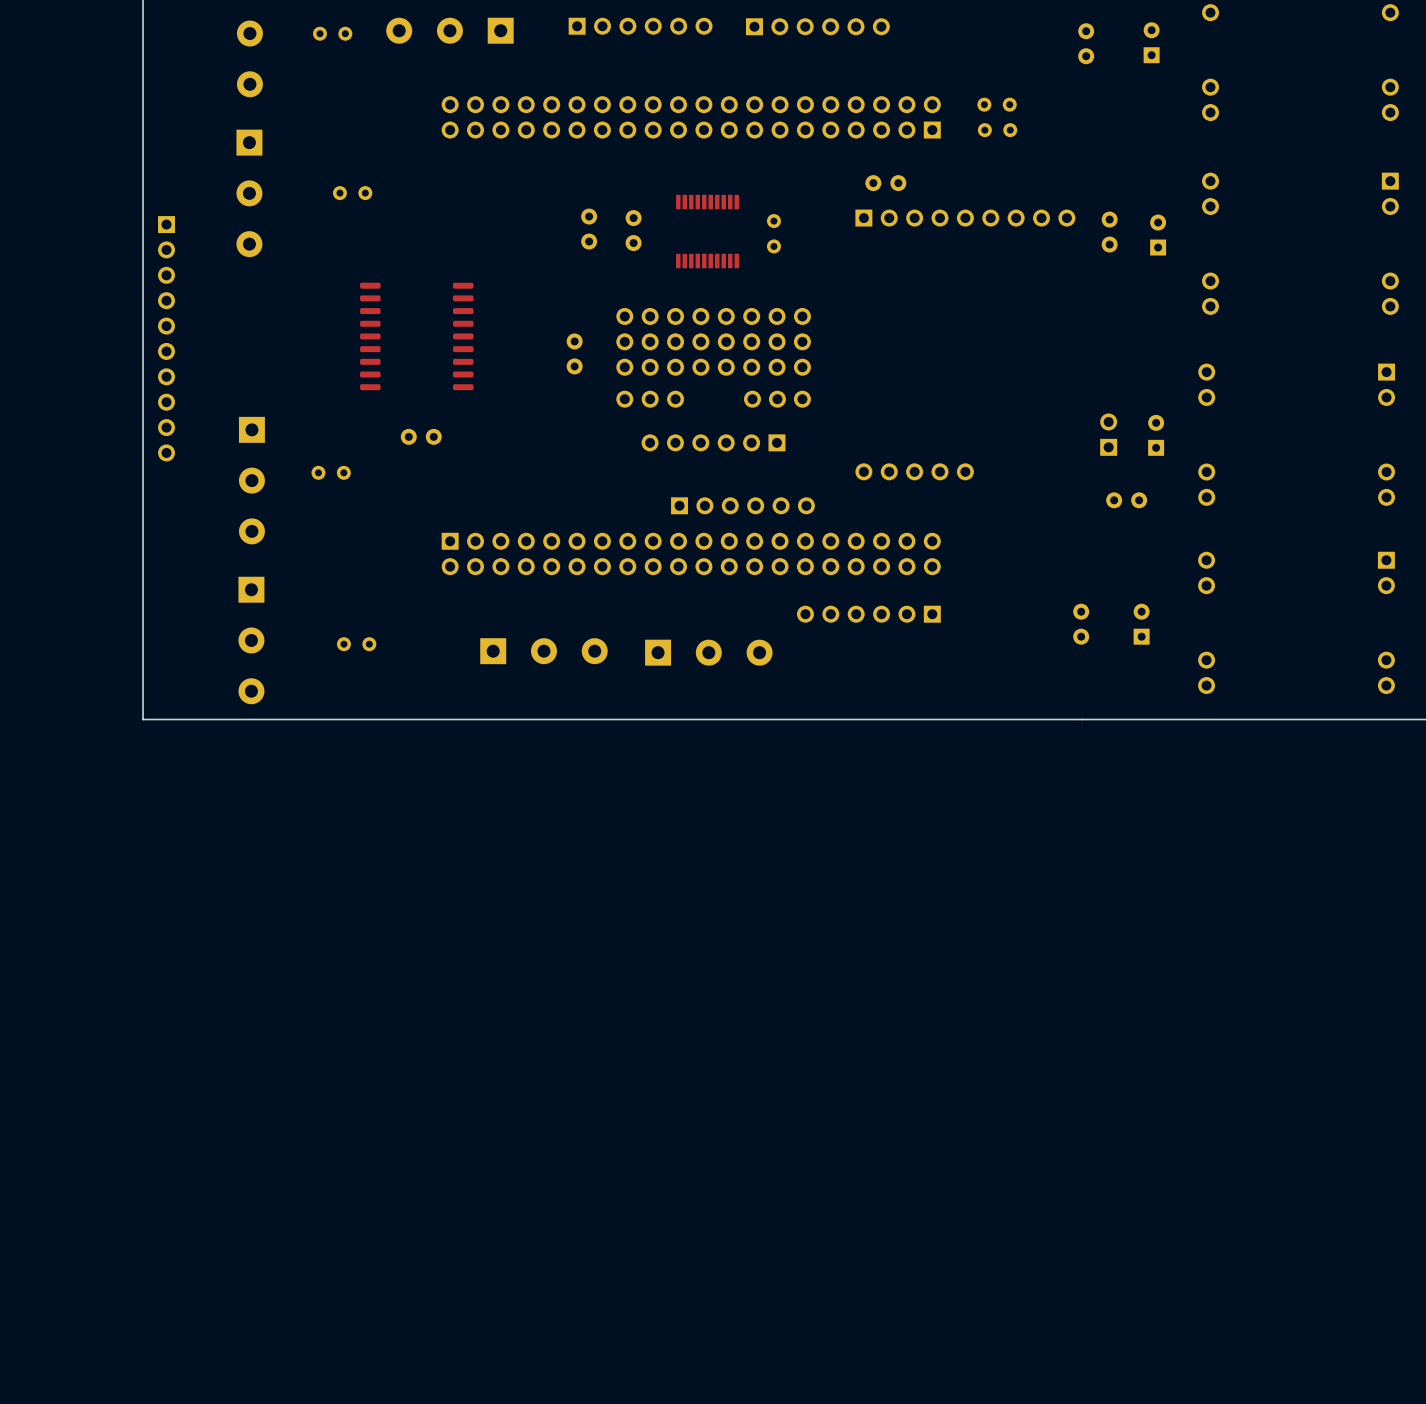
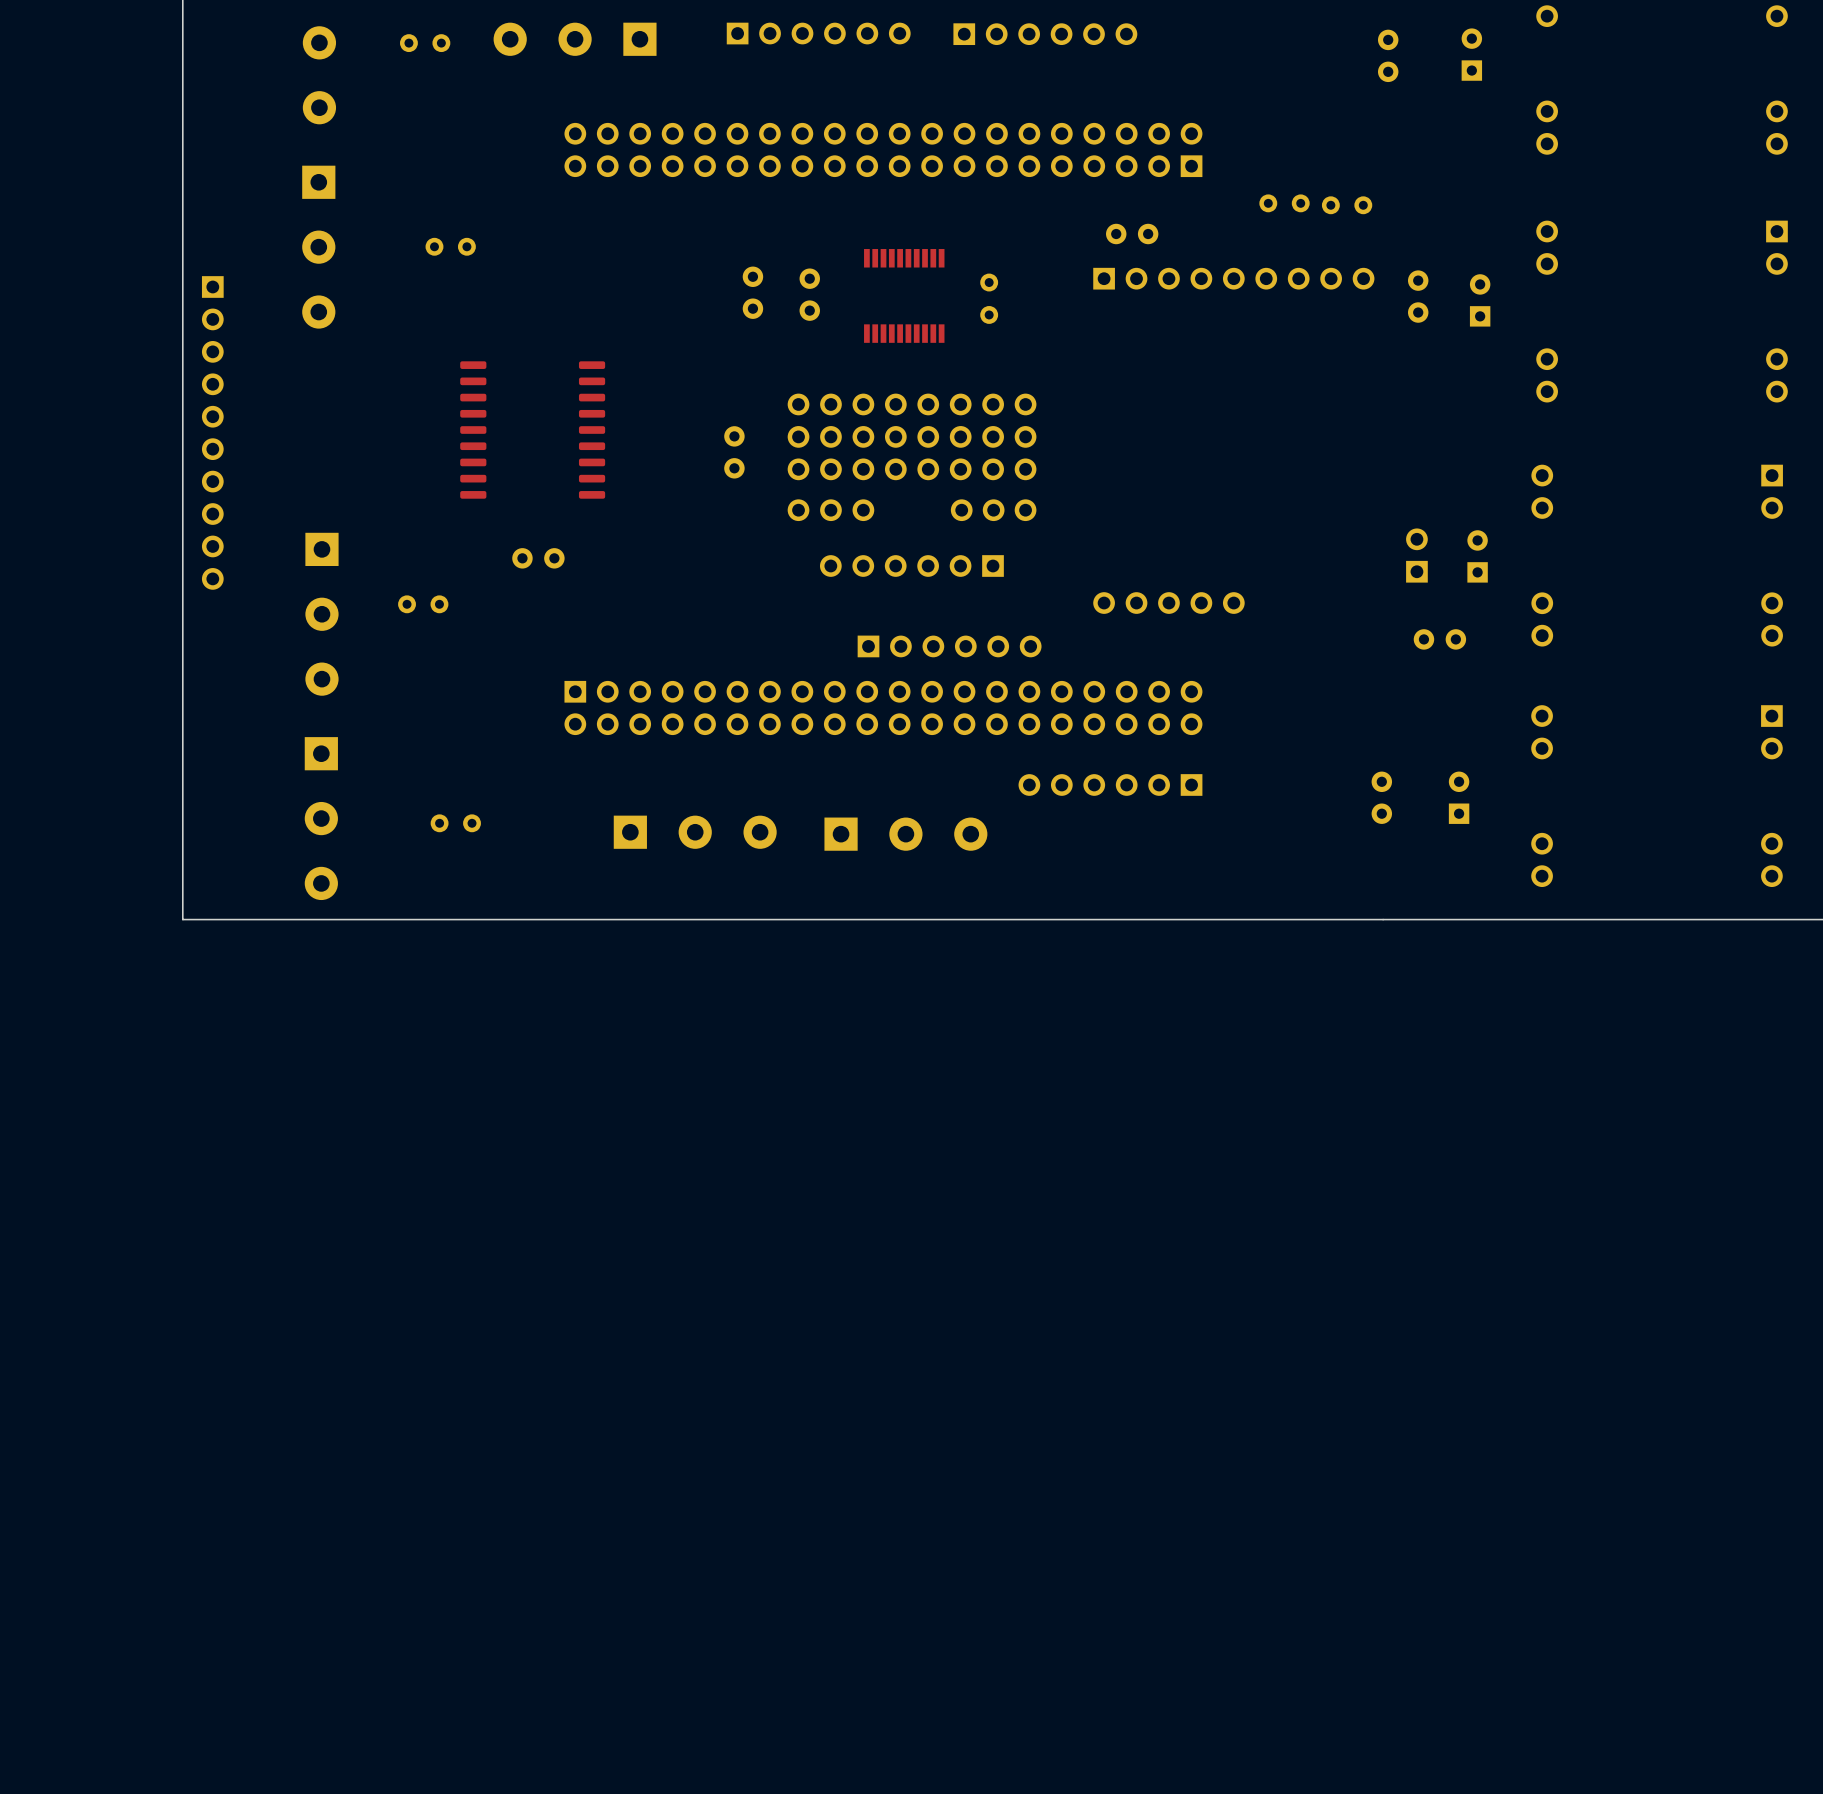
part: (997, 104) -> none
part: (997, 130) -> none
part: none -> (1284, 203)
part: none -> (1347, 205)

